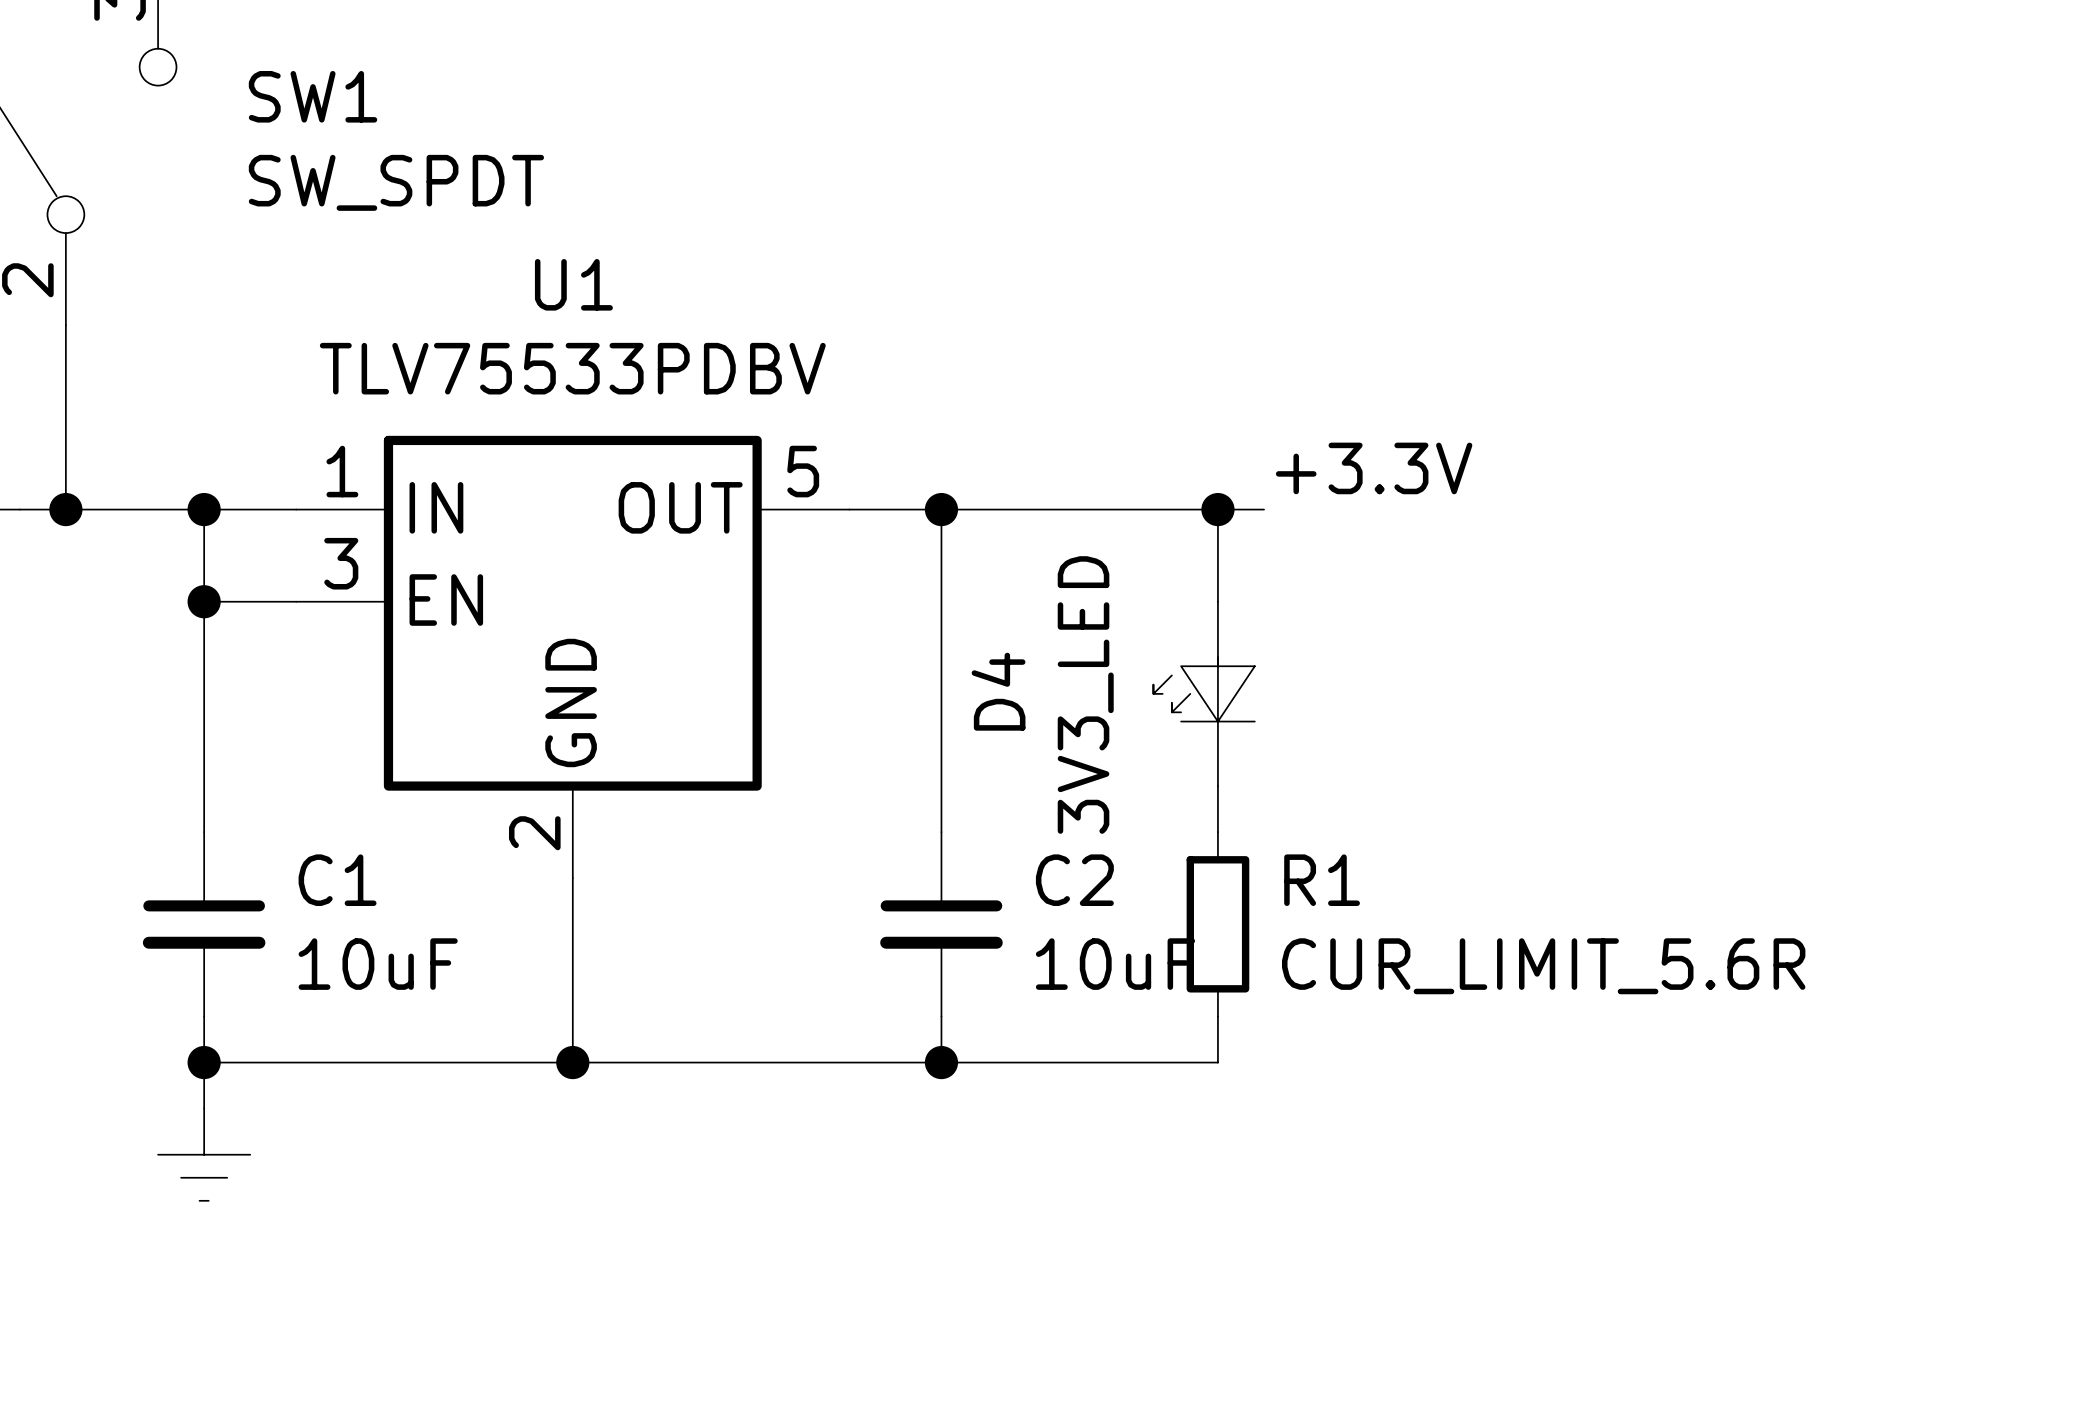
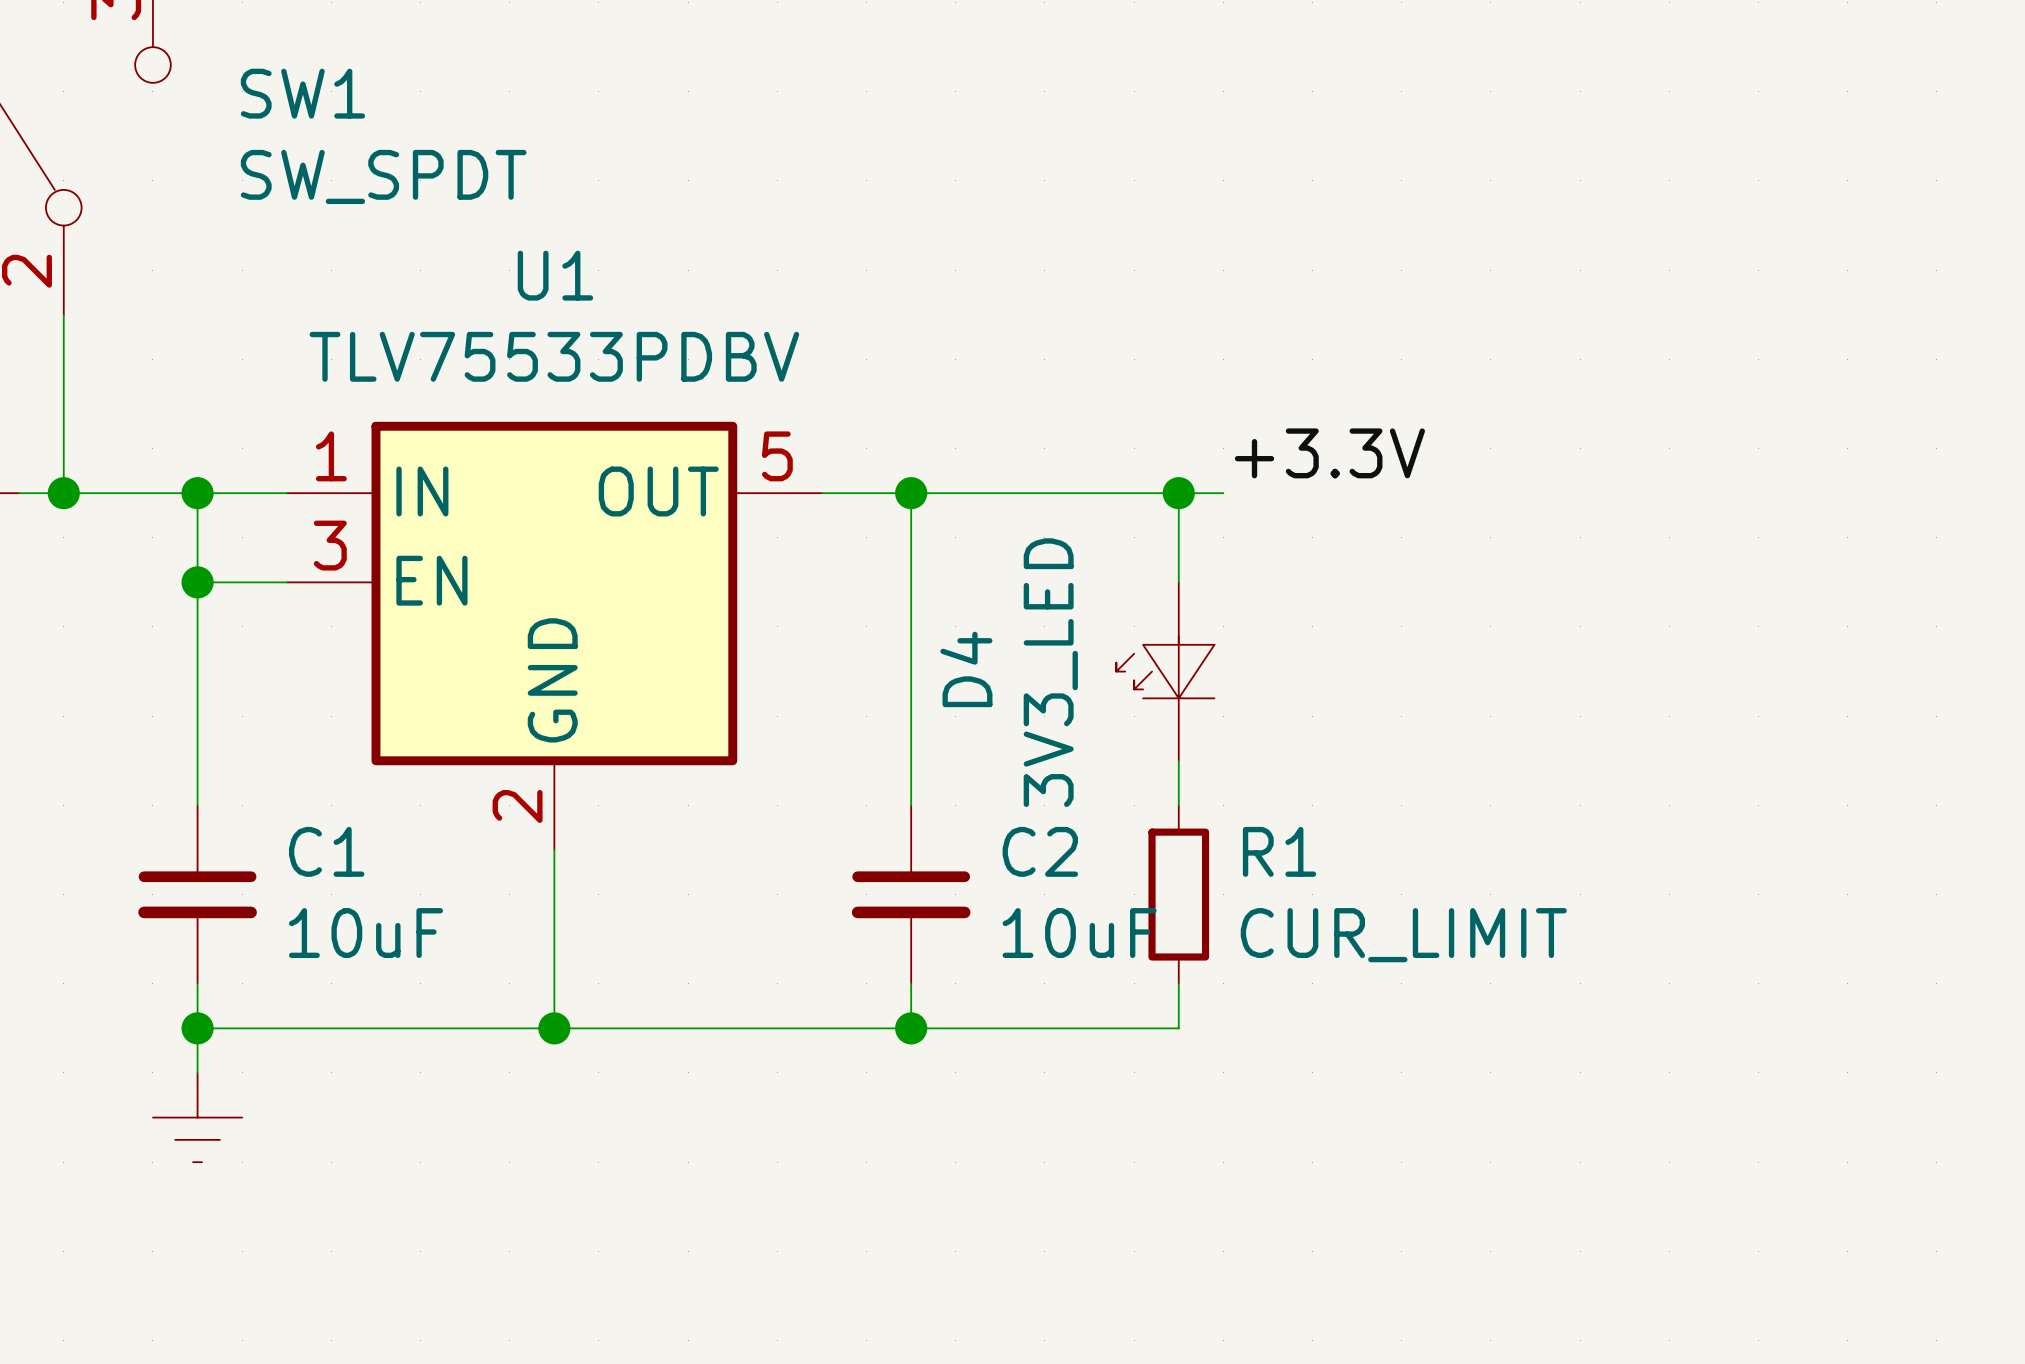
R1 value: CUR_LIMIT_5.6R (1543, 966) -> CUR_LIMIT (1403, 935)

